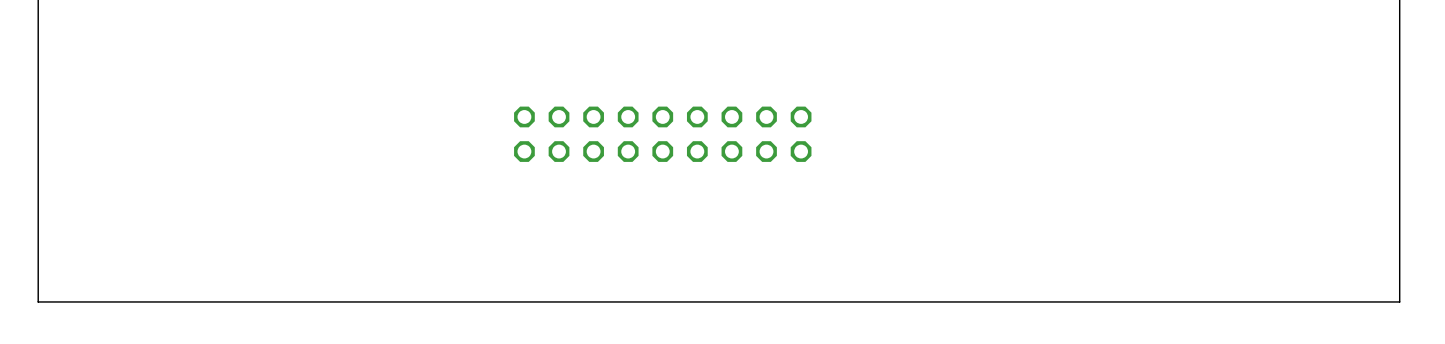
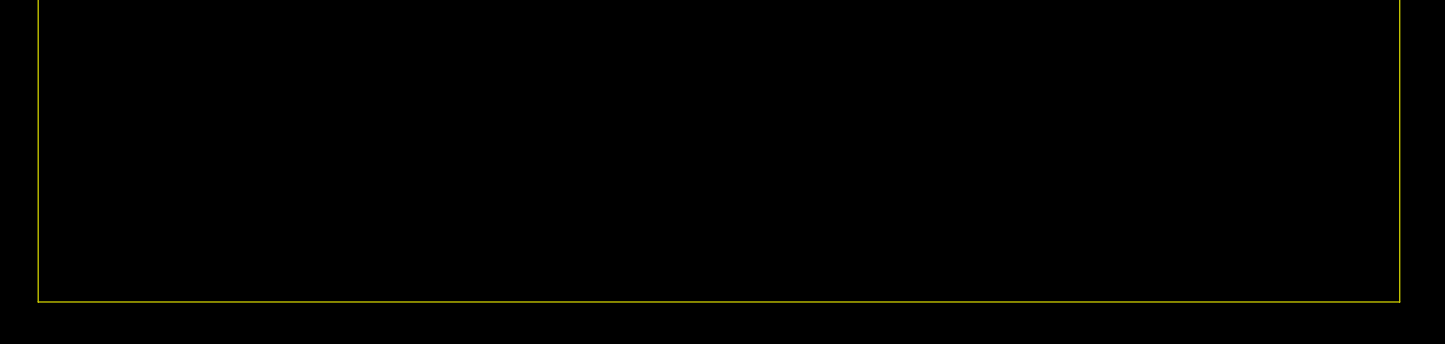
part: (662, 134) -> none

